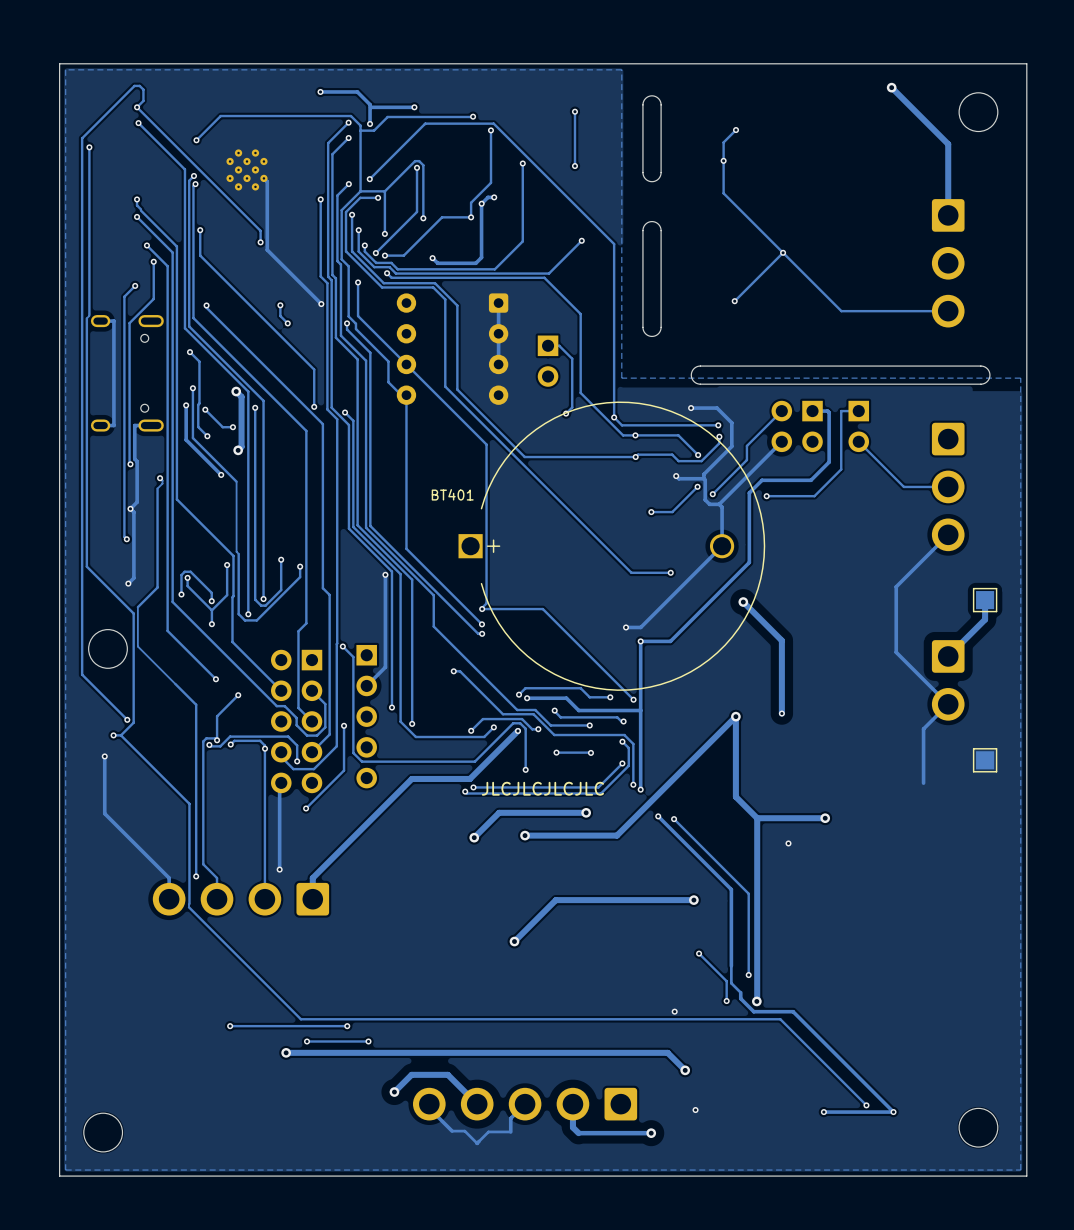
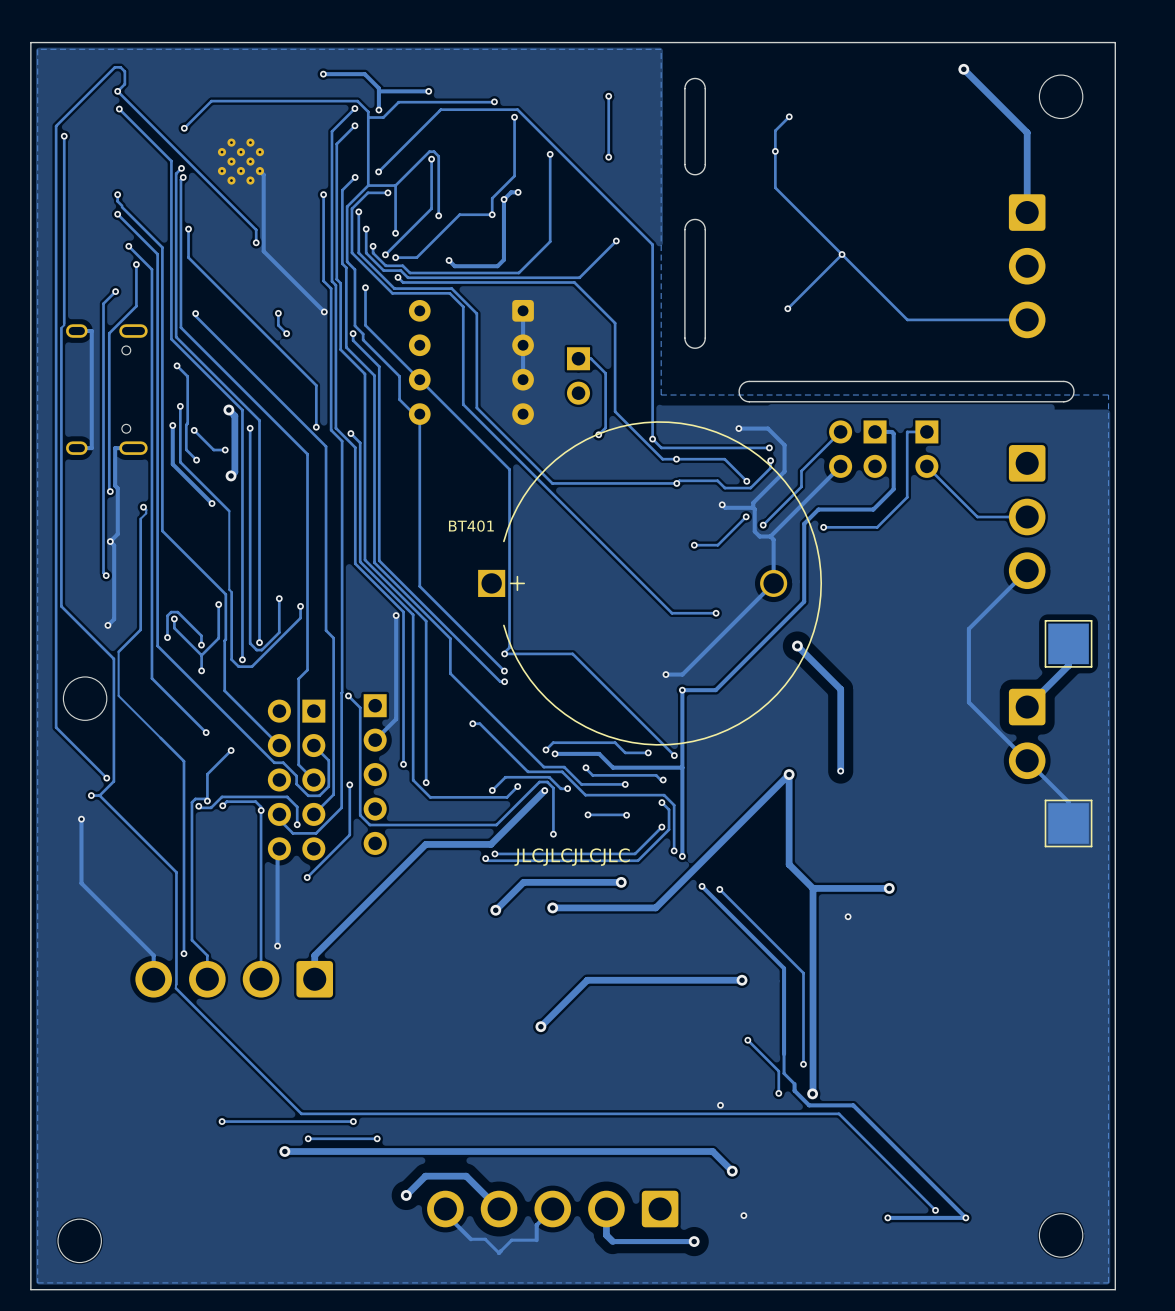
part footprint: [972, 587, 998, 613] -> [1044, 620, 1093, 668]
track: (948, 704) (923, 728) (923, 783) -> (1027, 760) (1068, 802) (1068, 823)
part footprint: [972, 748, 998, 773] -> [1044, 799, 1093, 848]

